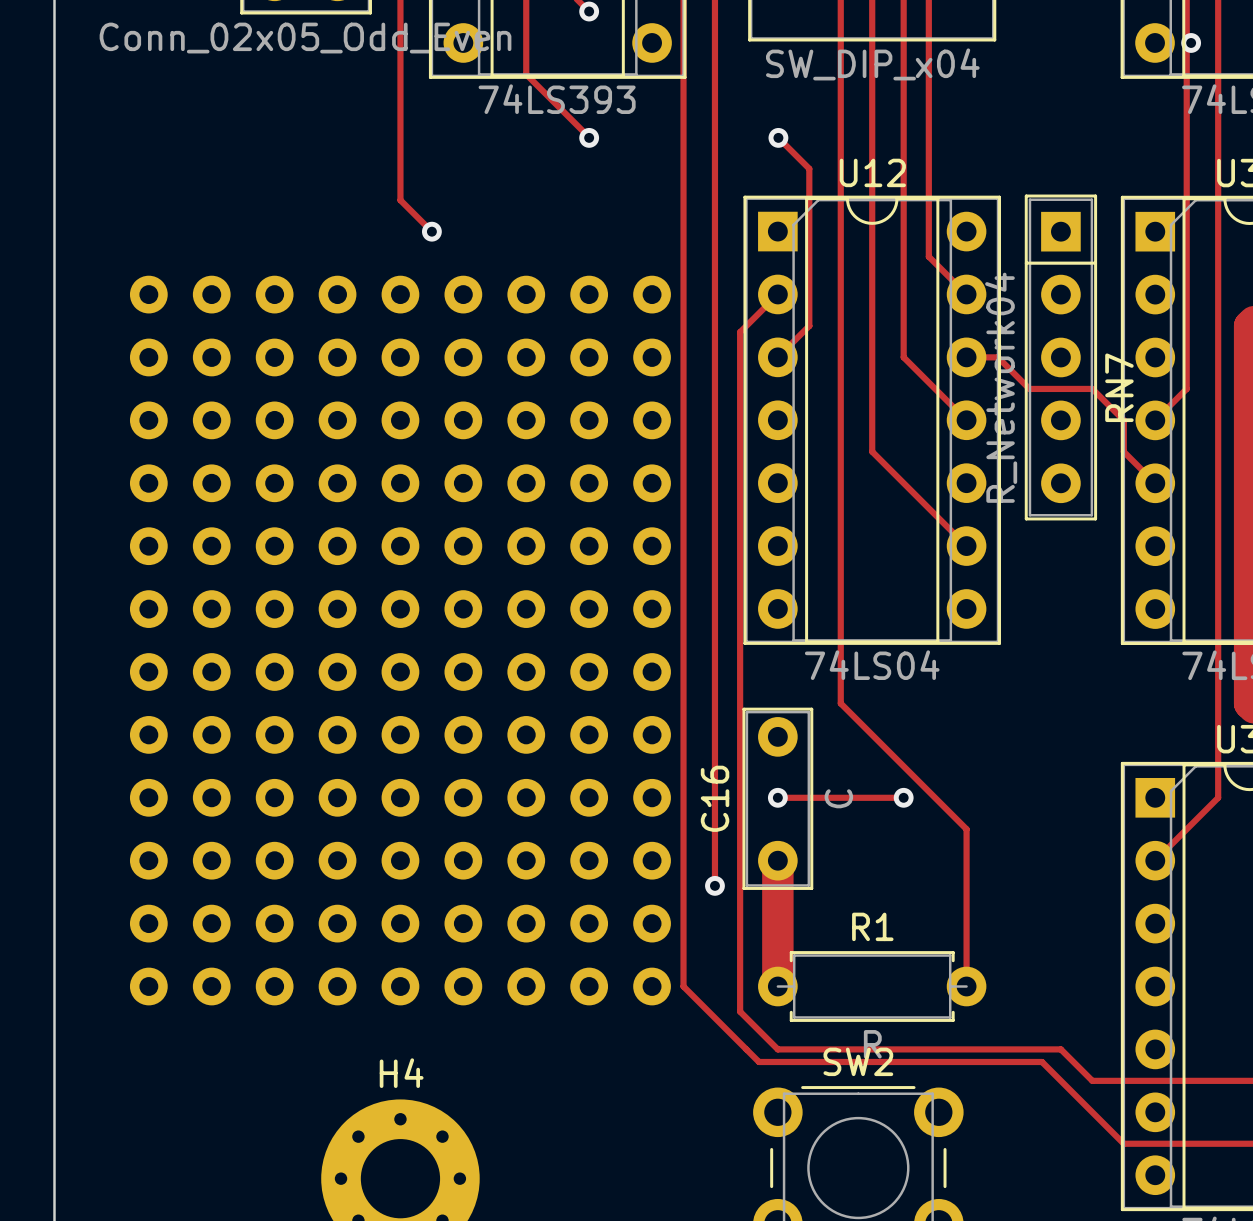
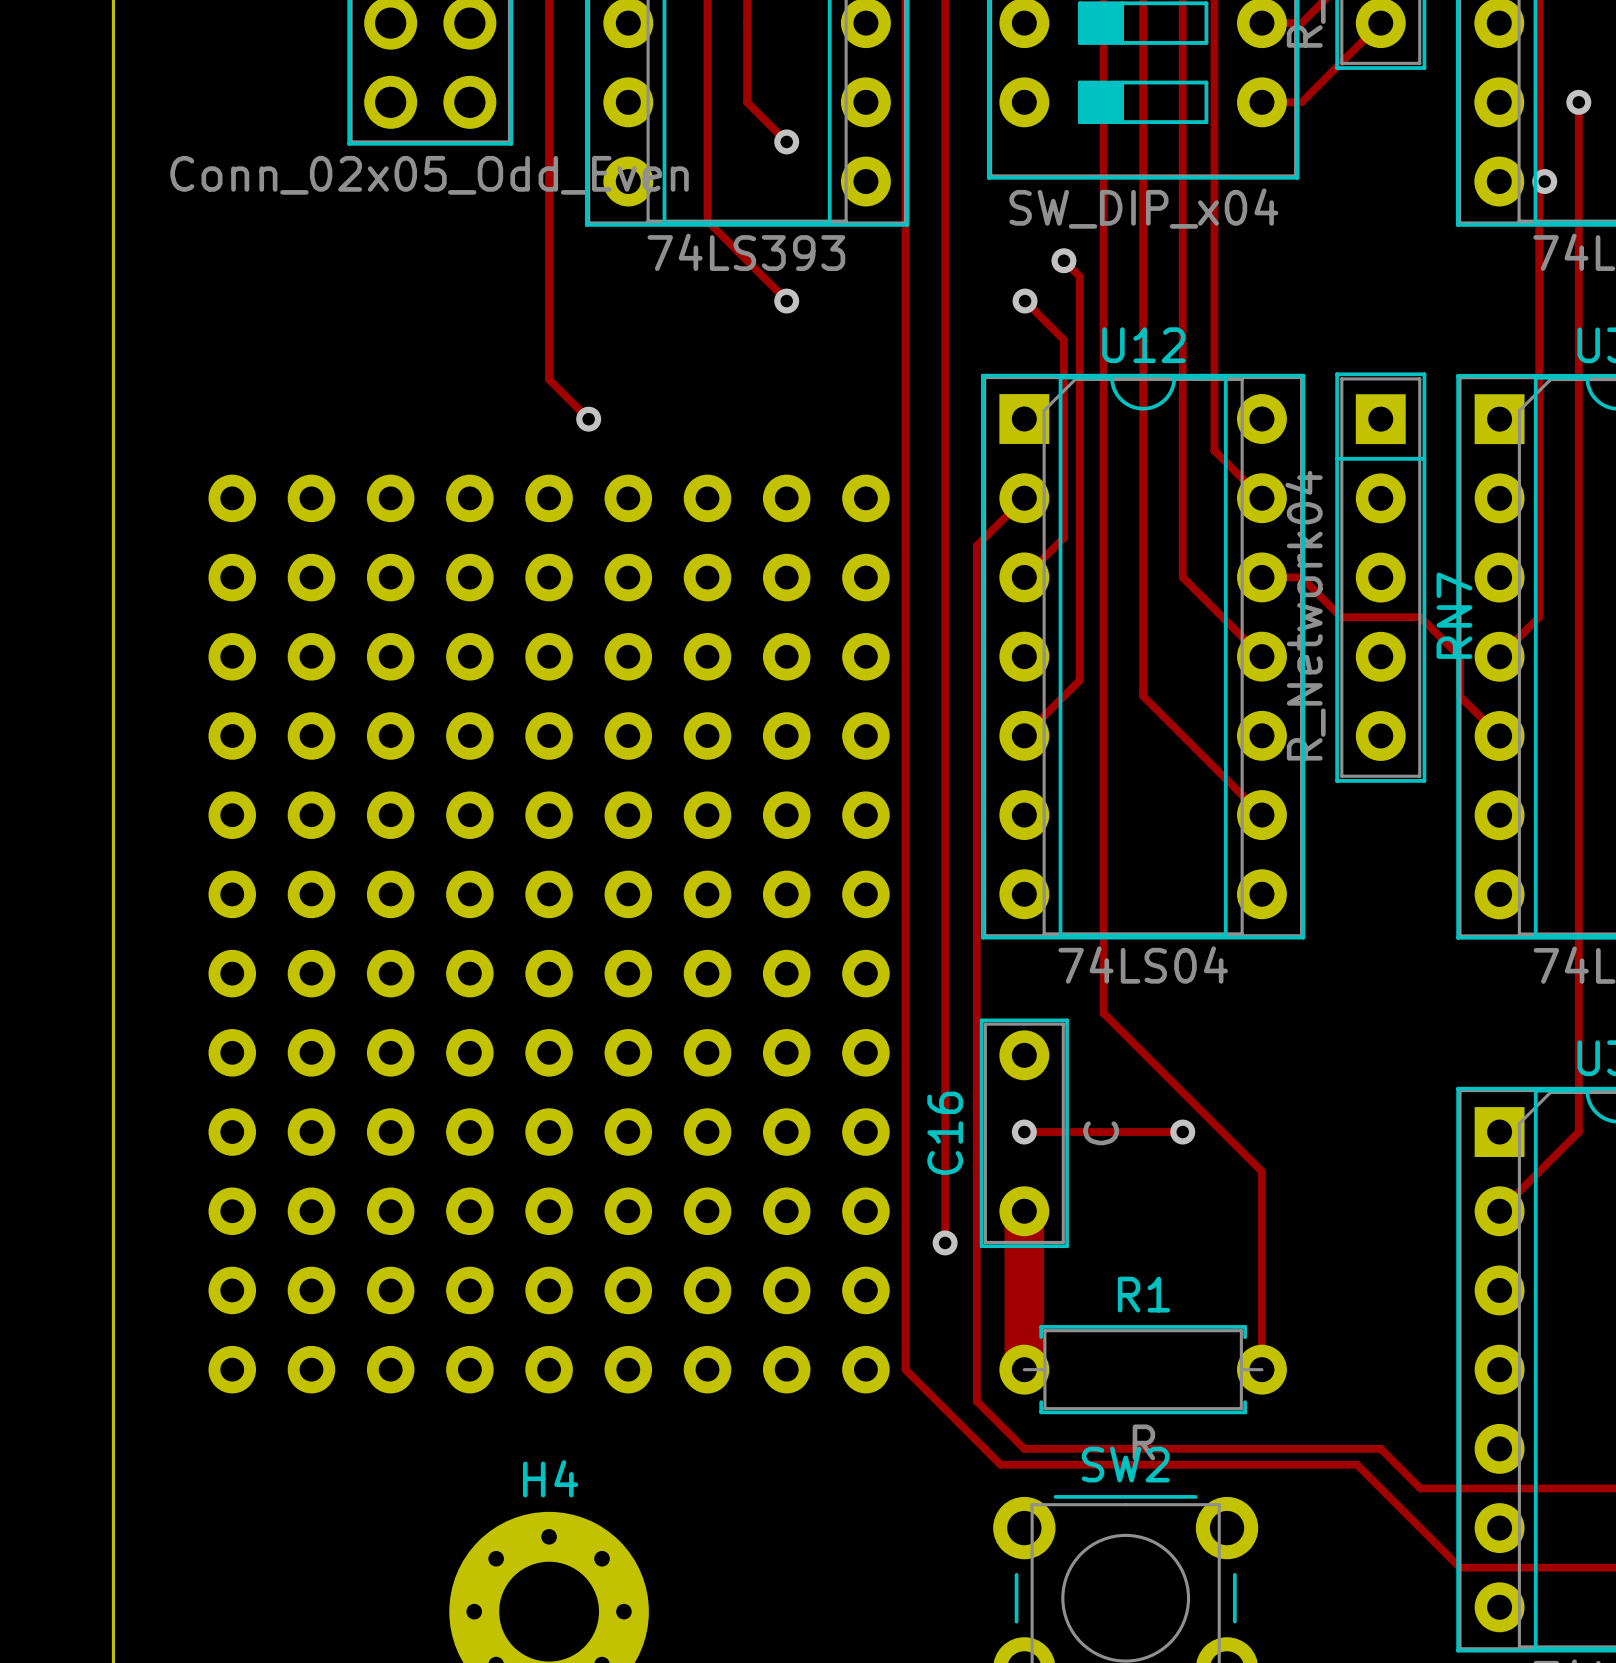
track: none -> (1063, 260) (1079, 276) (1079, 680) (1024, 735)
via: none -> (1063, 260)

